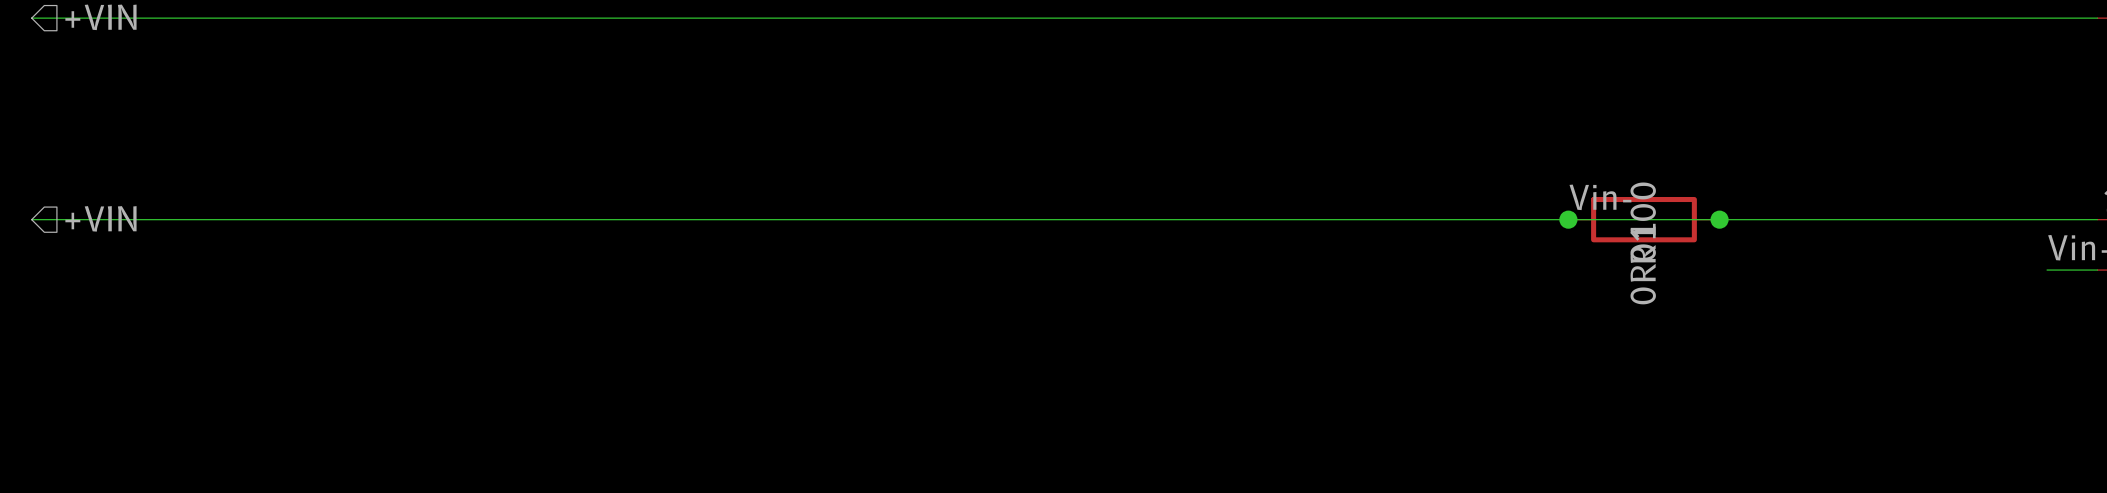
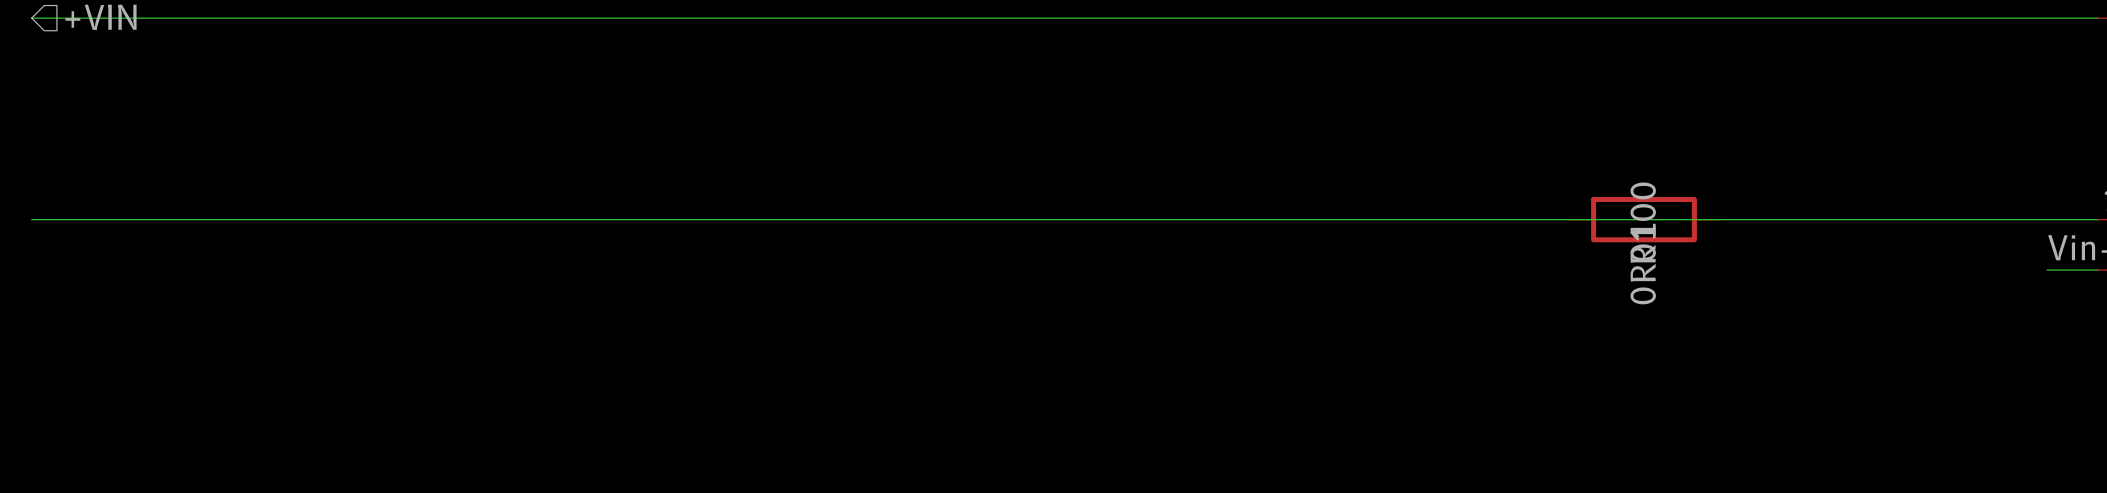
label: Vin- (1600, 197) -> none
hierarchical label: +VIN (100, 218) -> none
junction: (1568, 219) -> none
junction: (1719, 219) -> none

